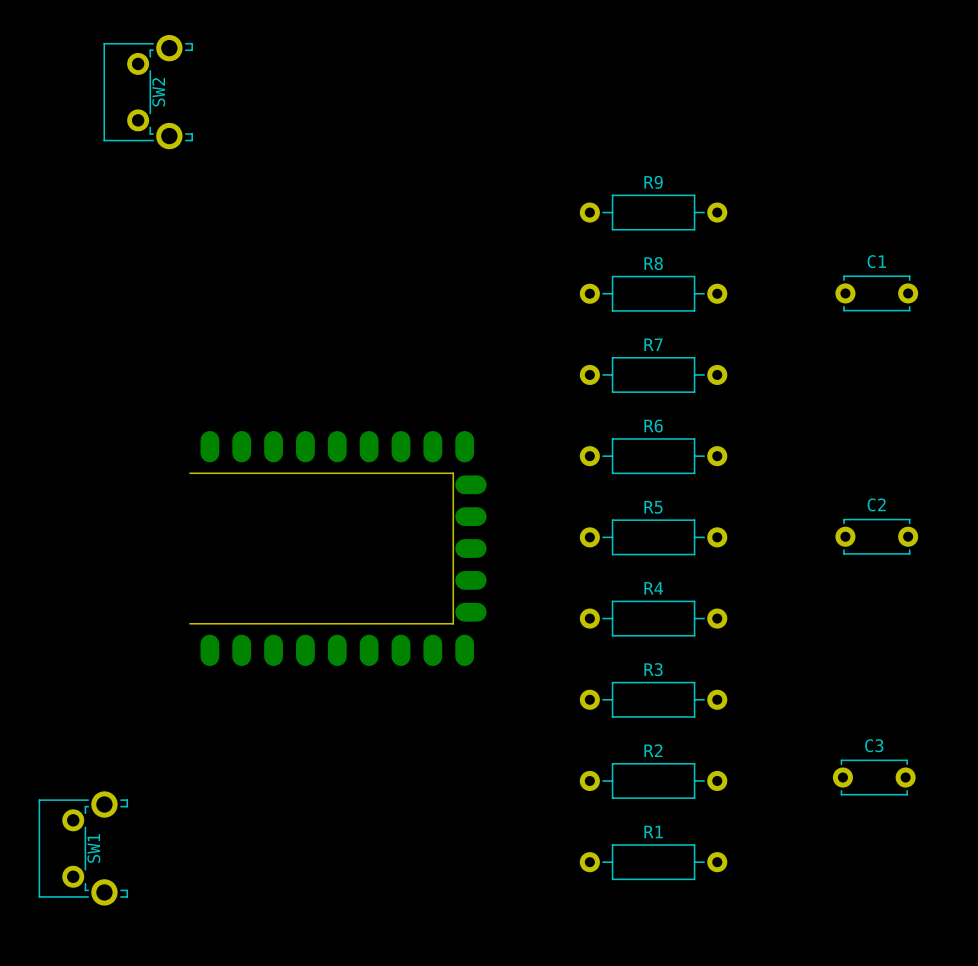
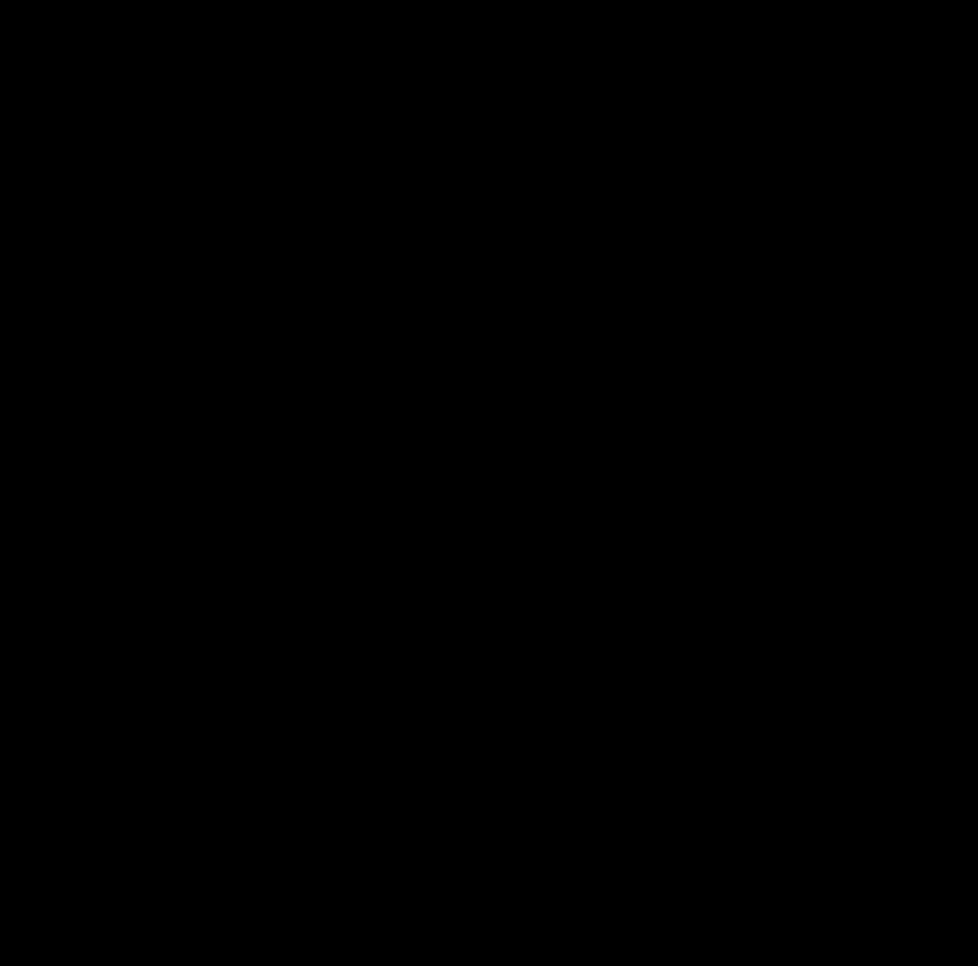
SW2: (148, 92) -> none
R9: (653, 212) -> none
R8: (653, 293) -> none
C1: (876, 293) -> none
R7: (653, 374) -> none
R6: (653, 456) -> none
C2: (876, 536) -> none
R5: (653, 537) -> none
part: (337, 548) -> none
R4: (653, 618) -> none
R3: (653, 699) -> none
C3: (874, 777) -> none
R2: (653, 780) -> none
SW1: (83, 848) -> none
R1: (653, 862) -> none

